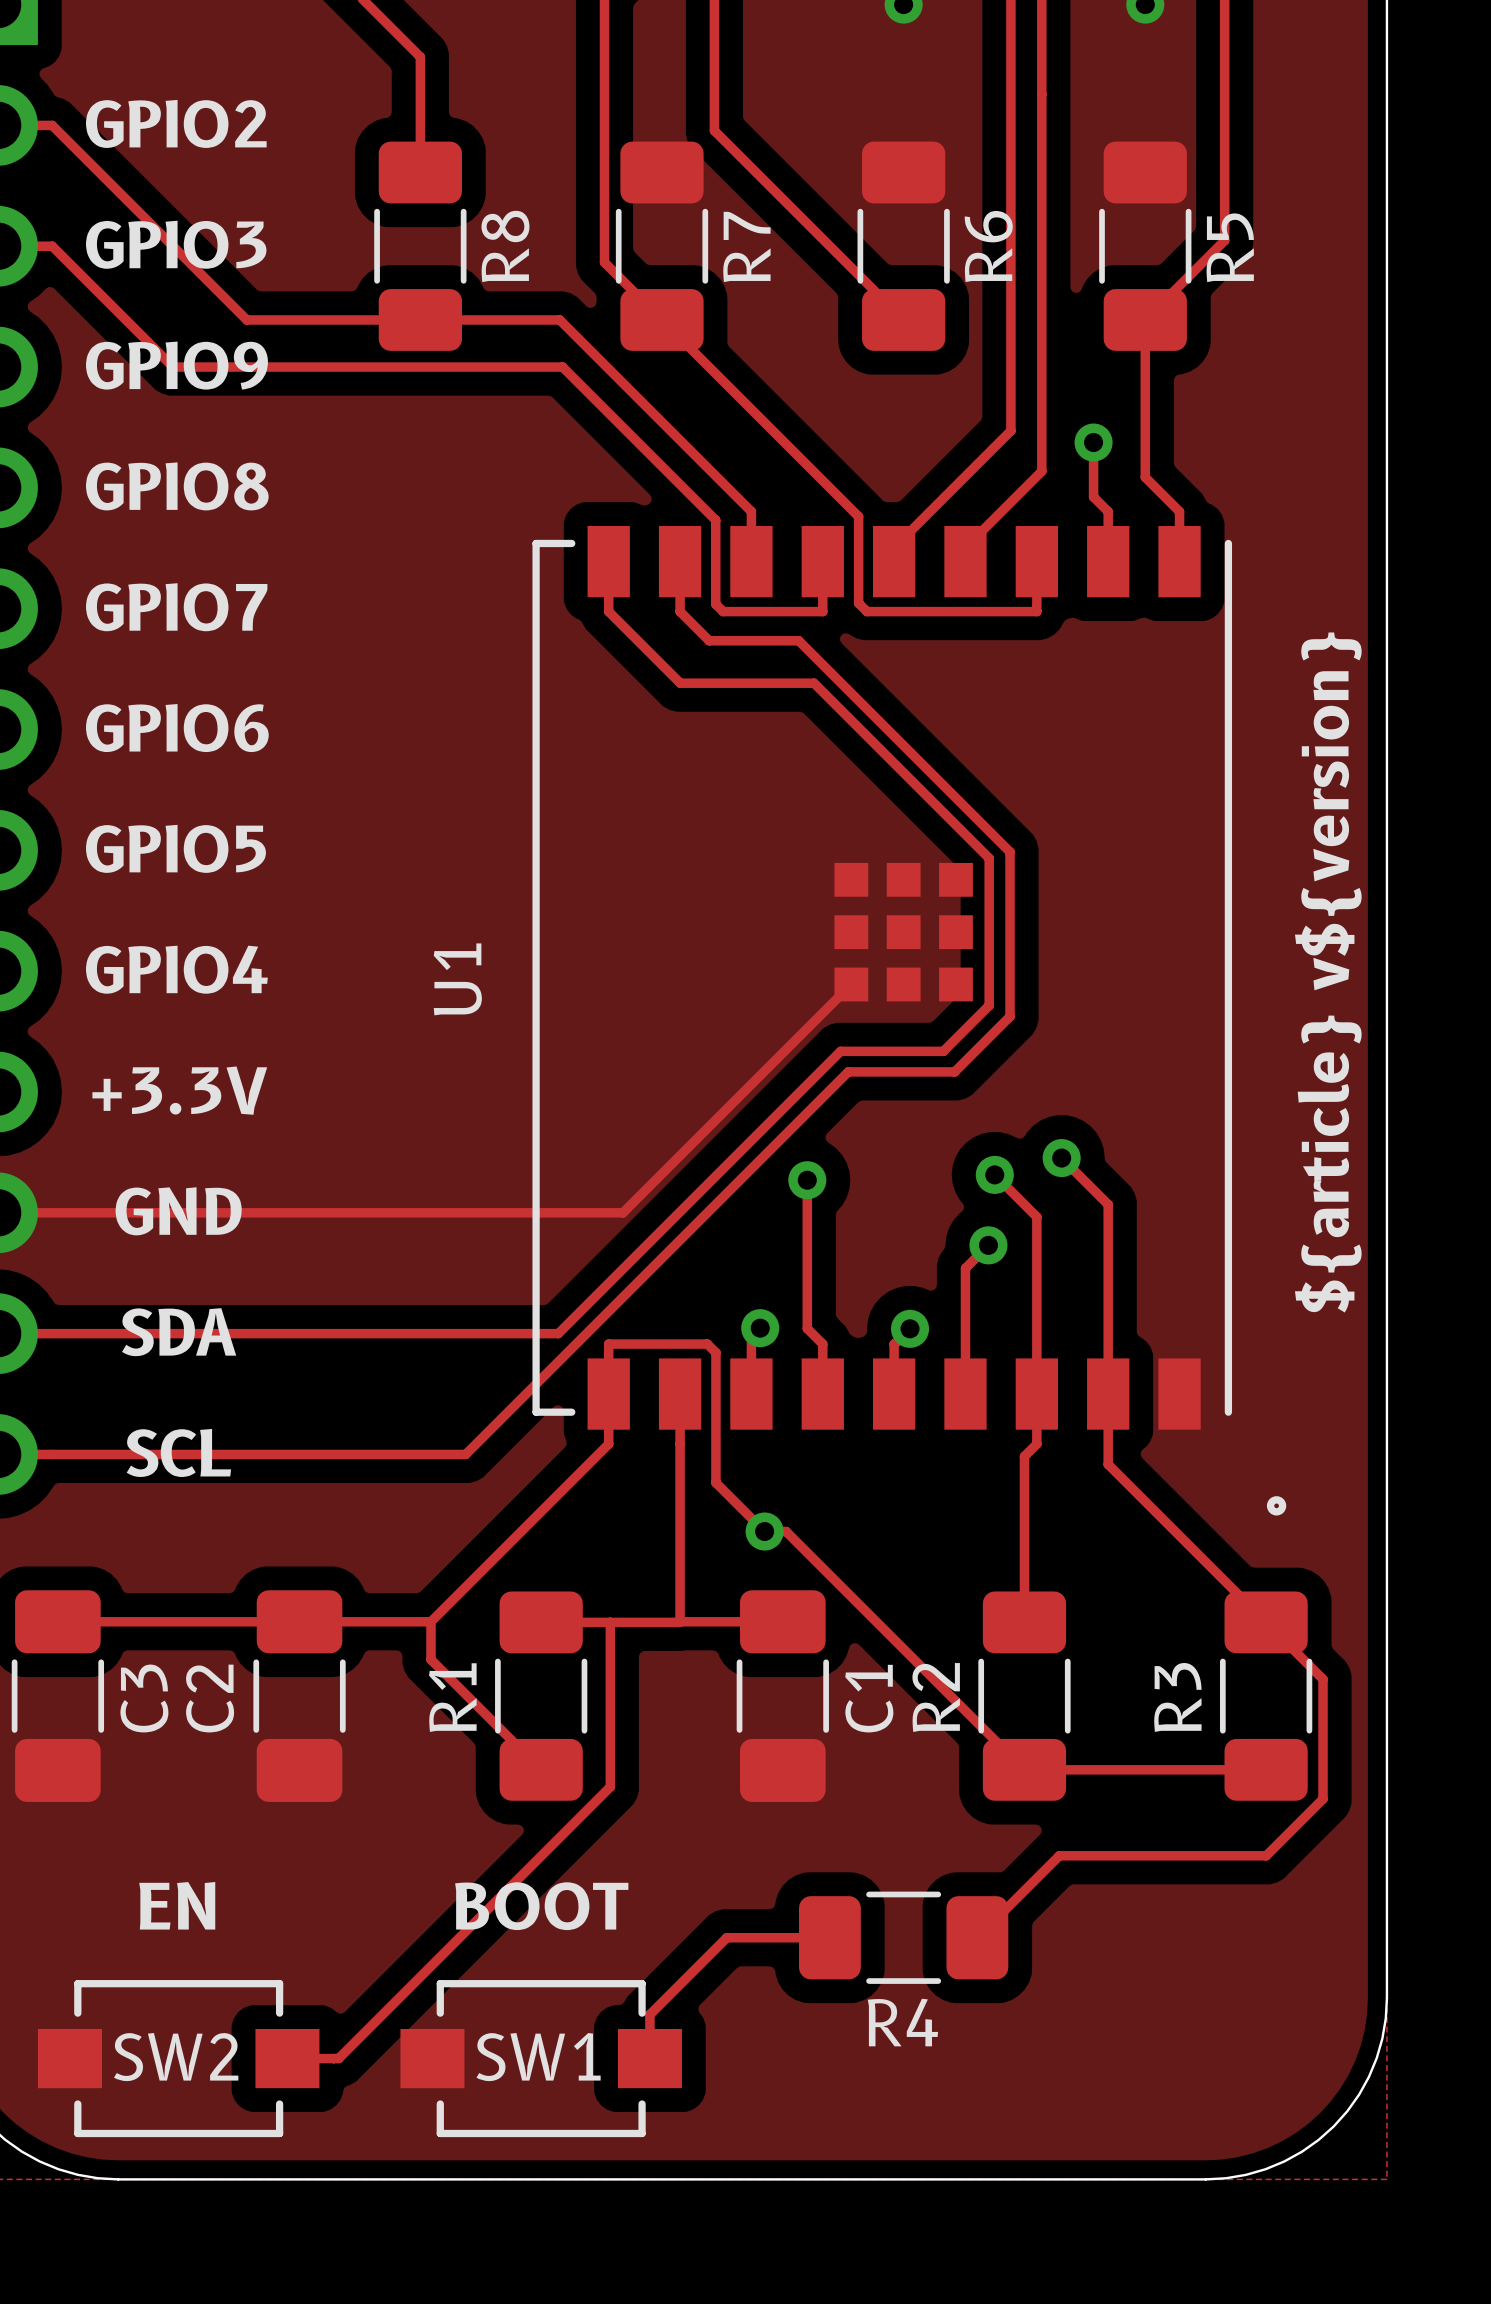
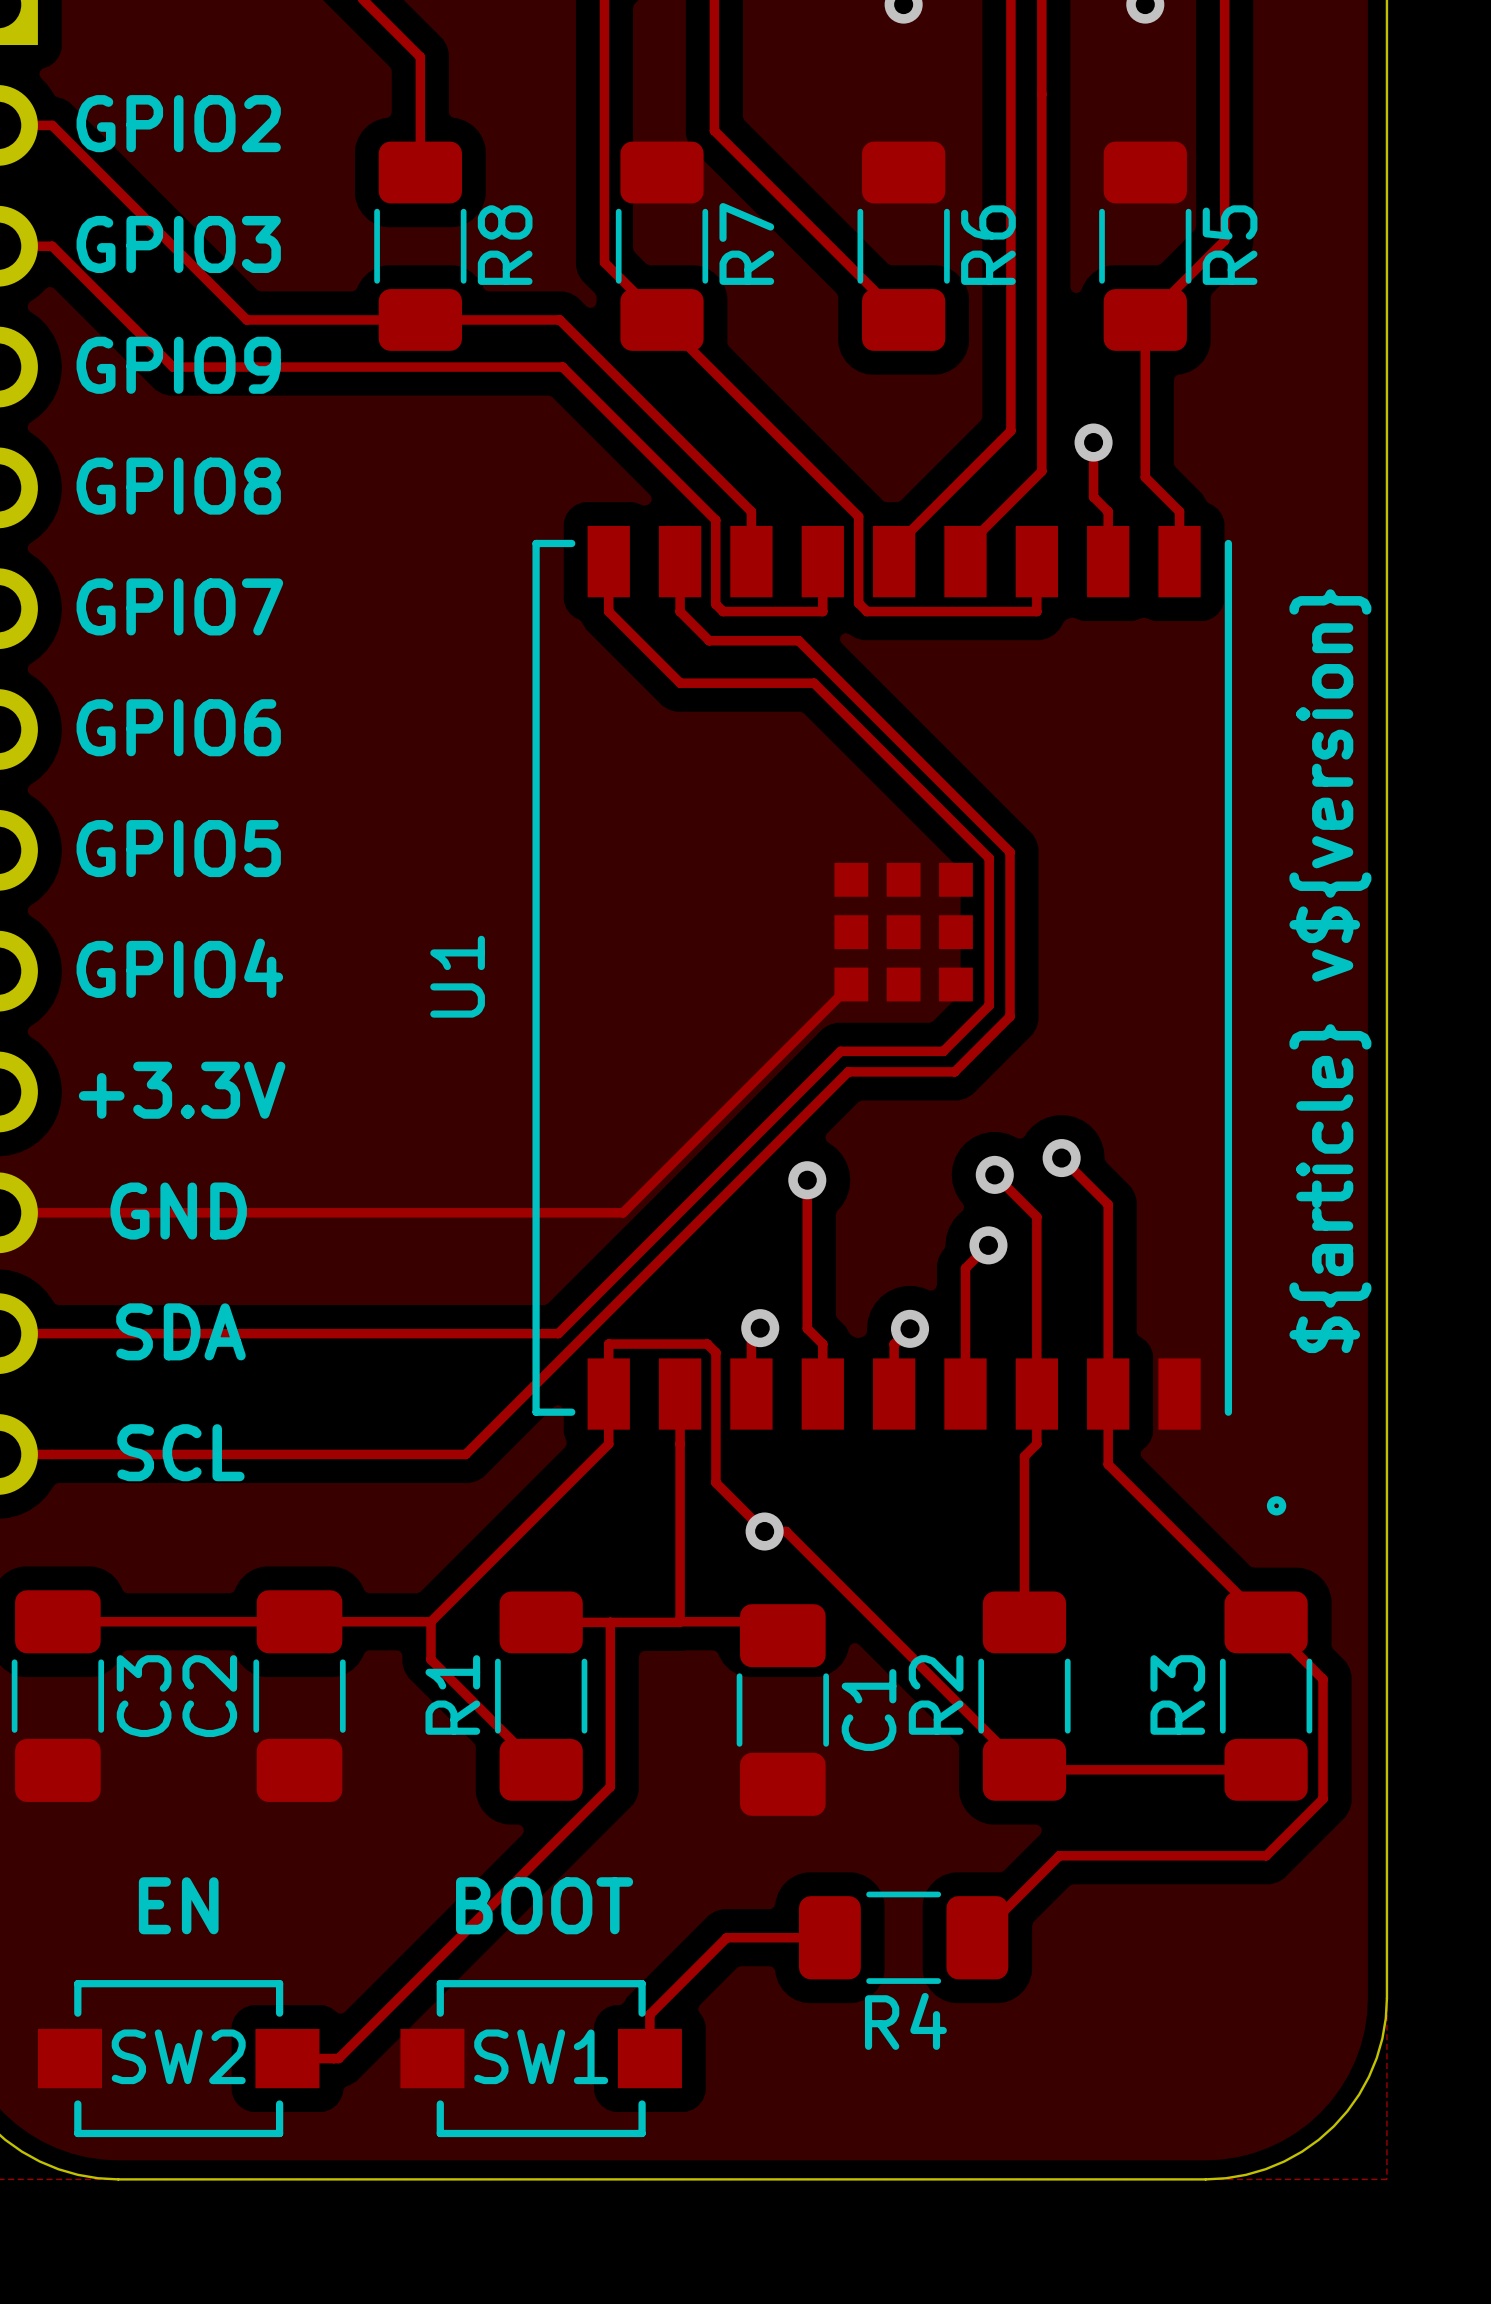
C1 position: (782, 1696) -> (782, 1710)

